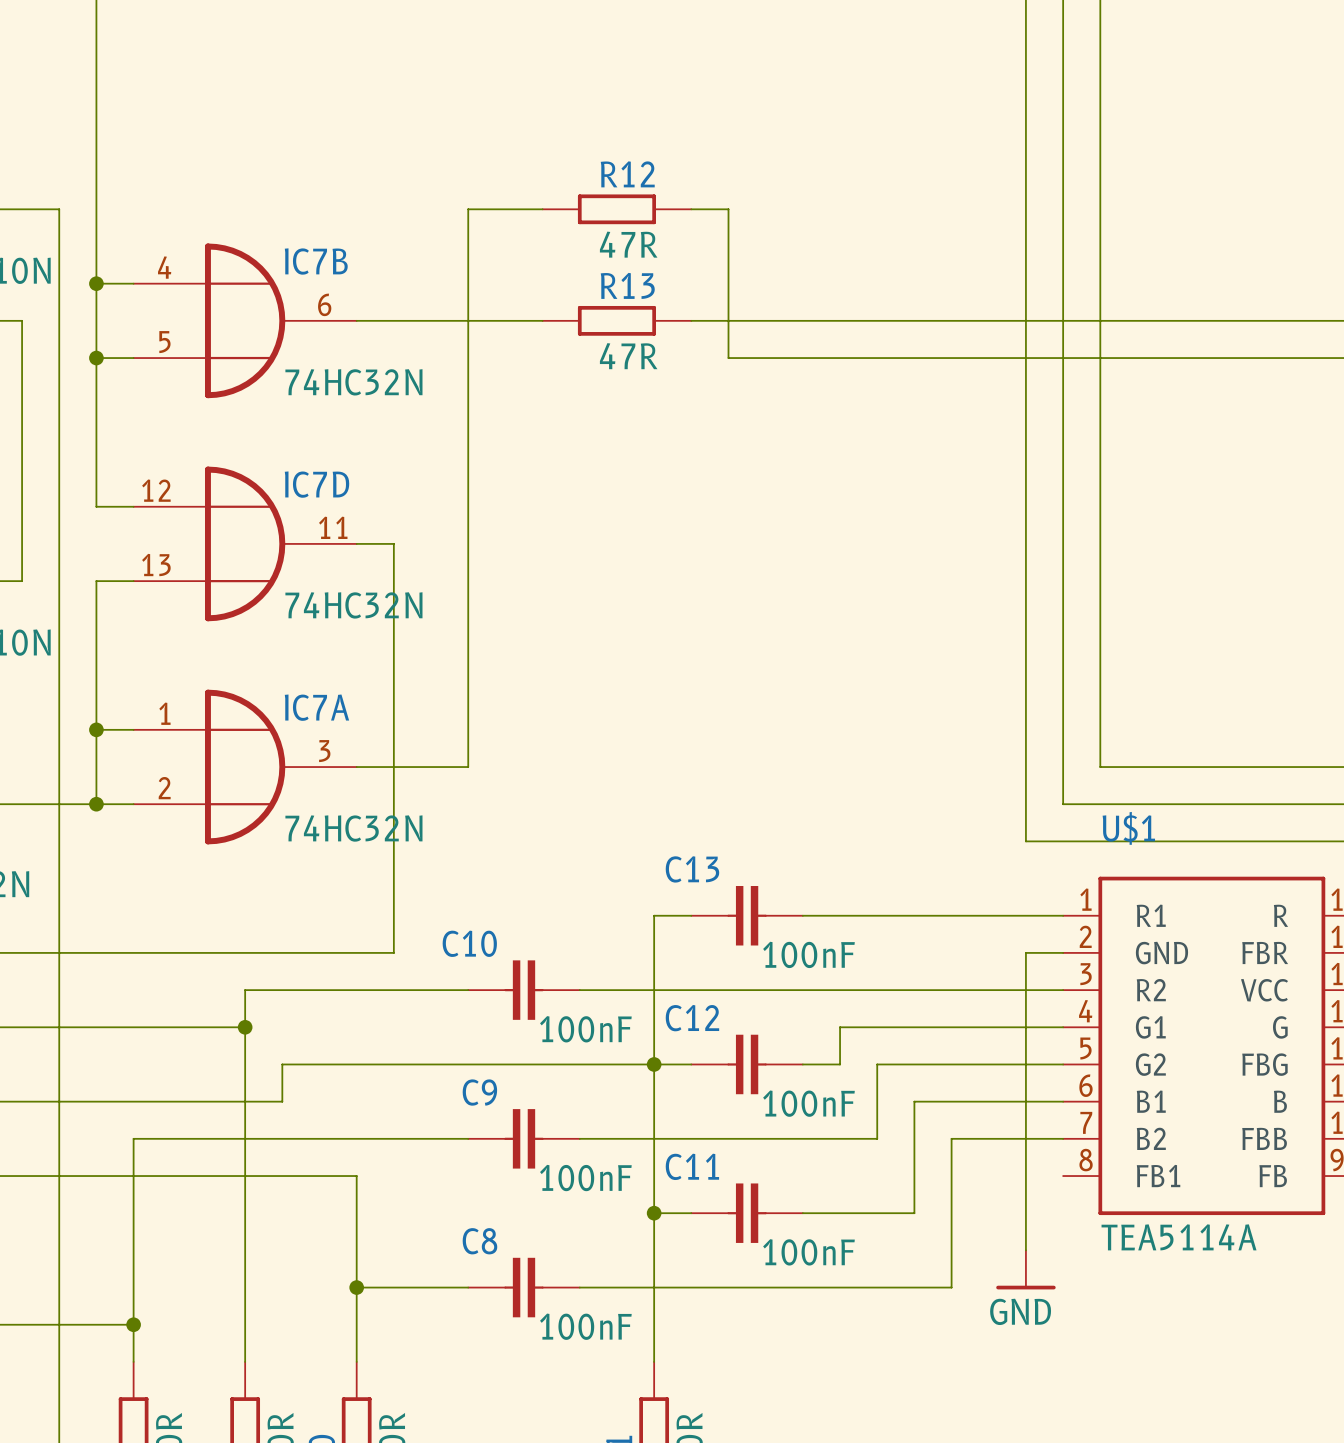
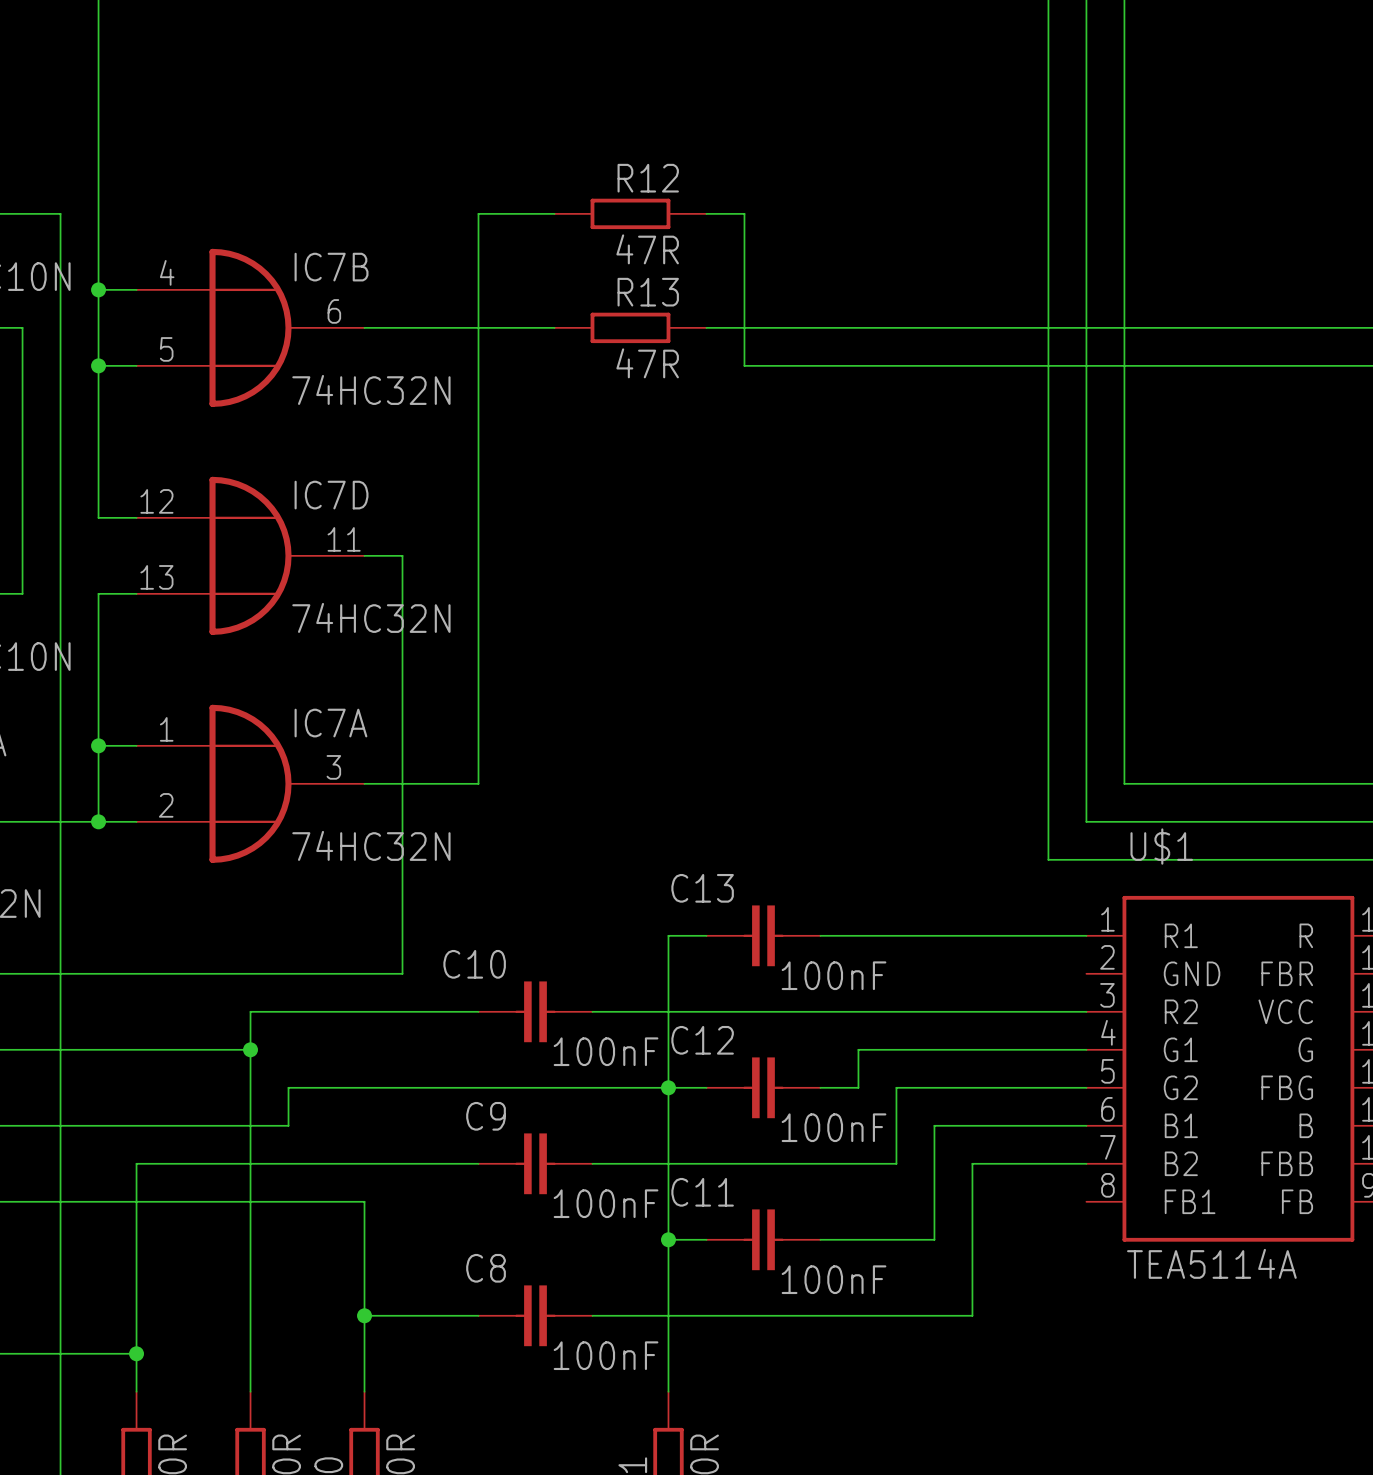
wire: (1063, 952) (1025, 952) (1025, 1250) -> none
power symbol: GND (1025, 1269) -> none

